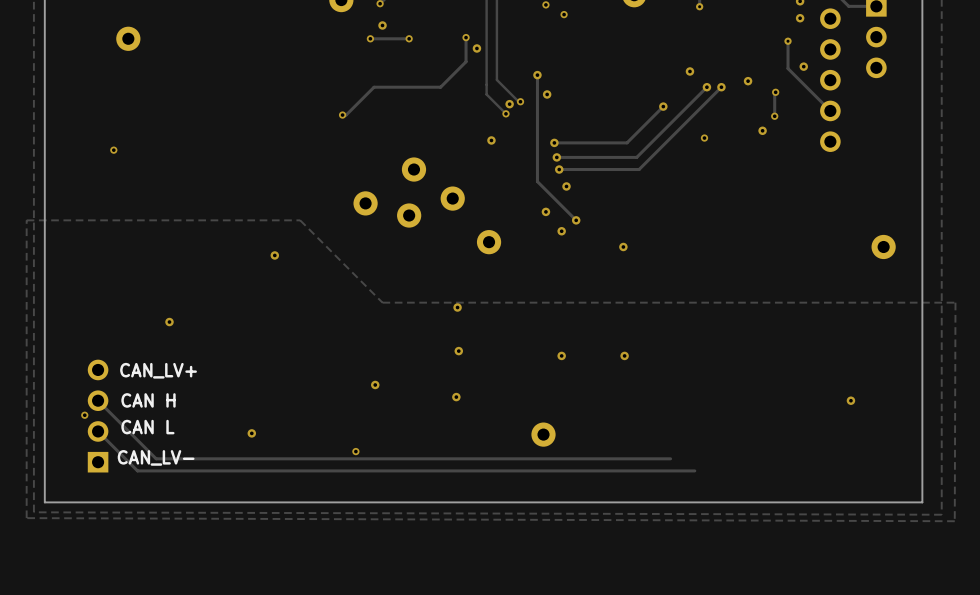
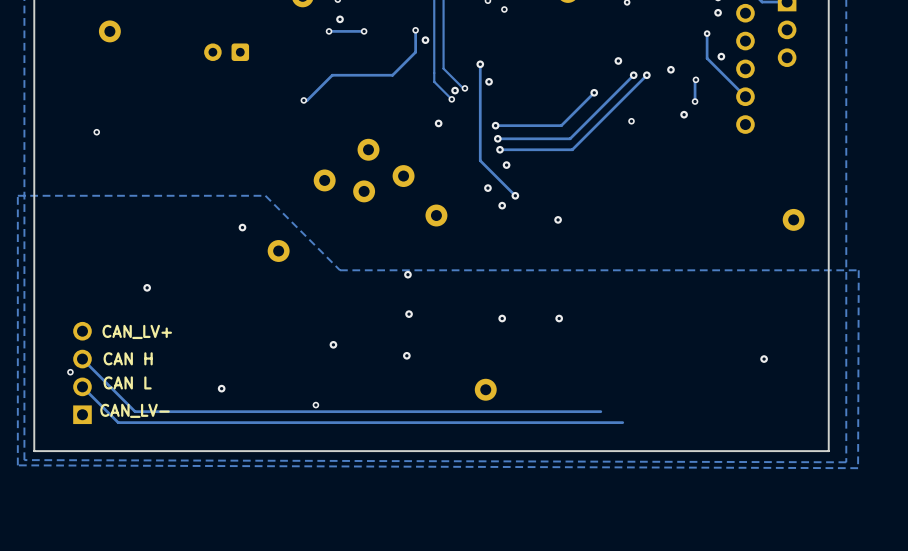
part: none -> (226, 52)
part: none -> (278, 251)

